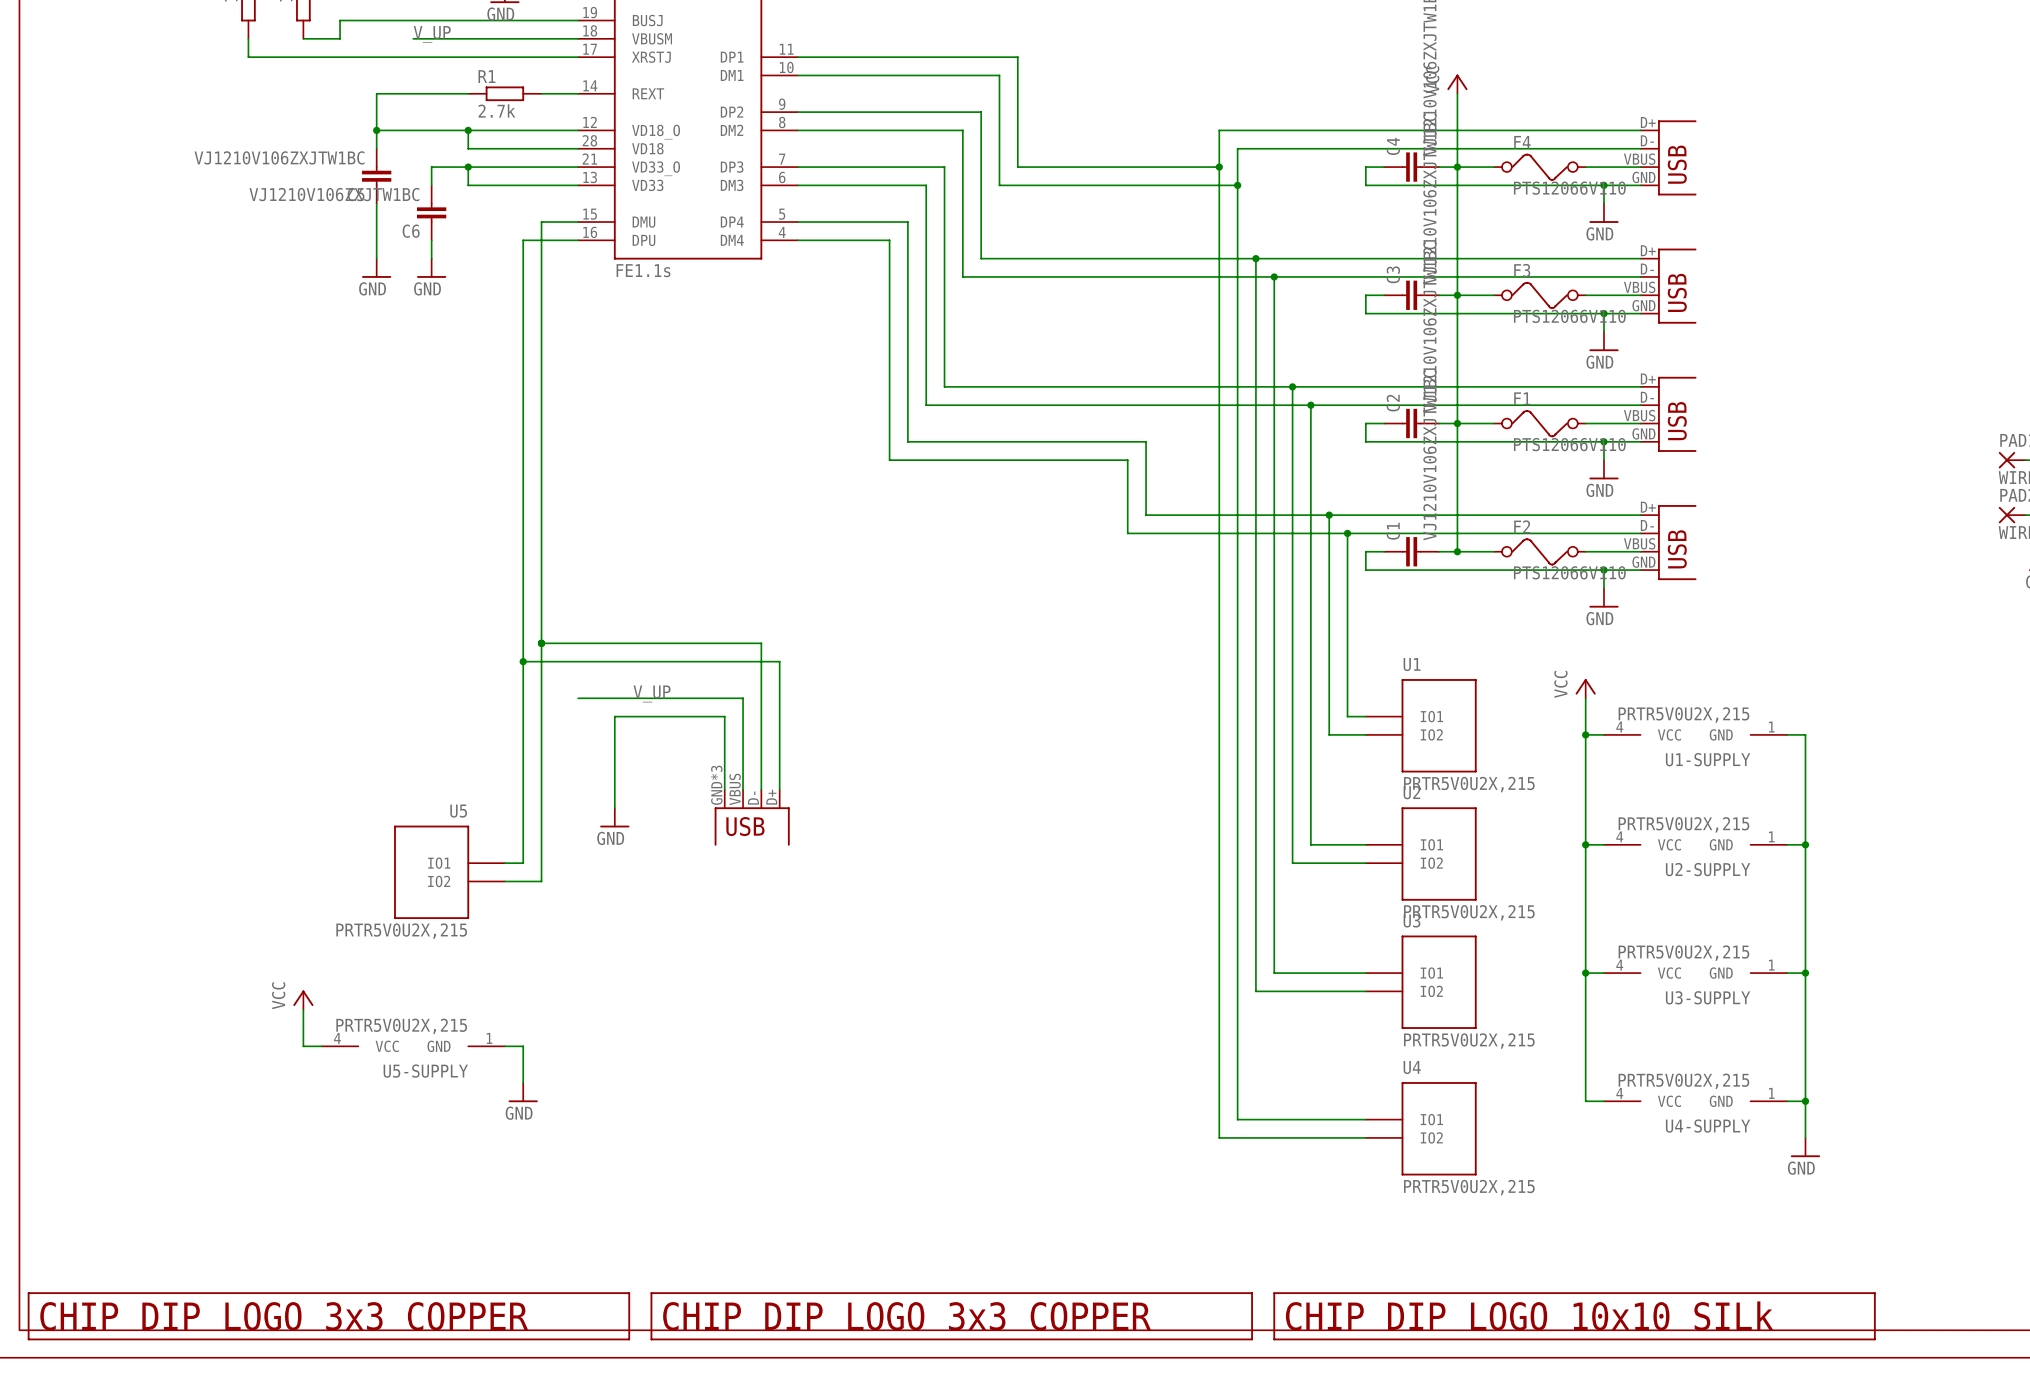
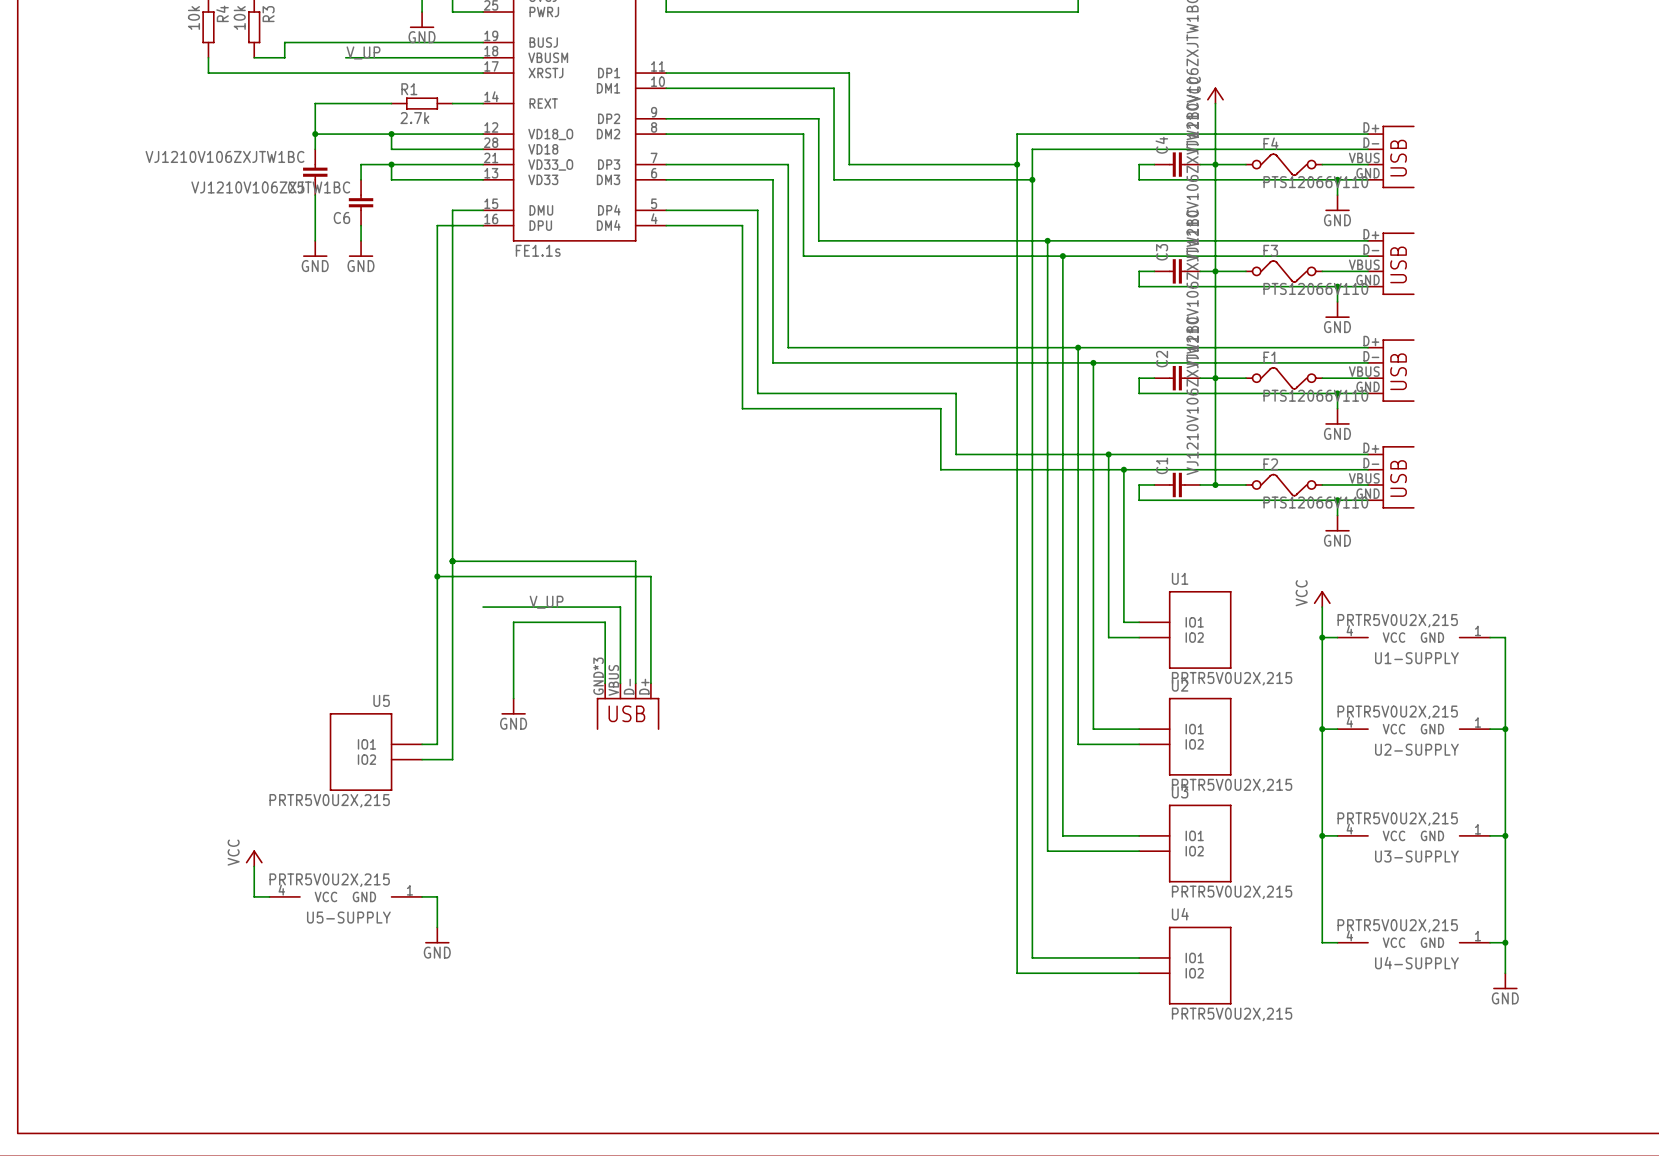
part: (328, 1316) -> none
part: (951, 1316) -> none
part: (1574, 1316) -> none

